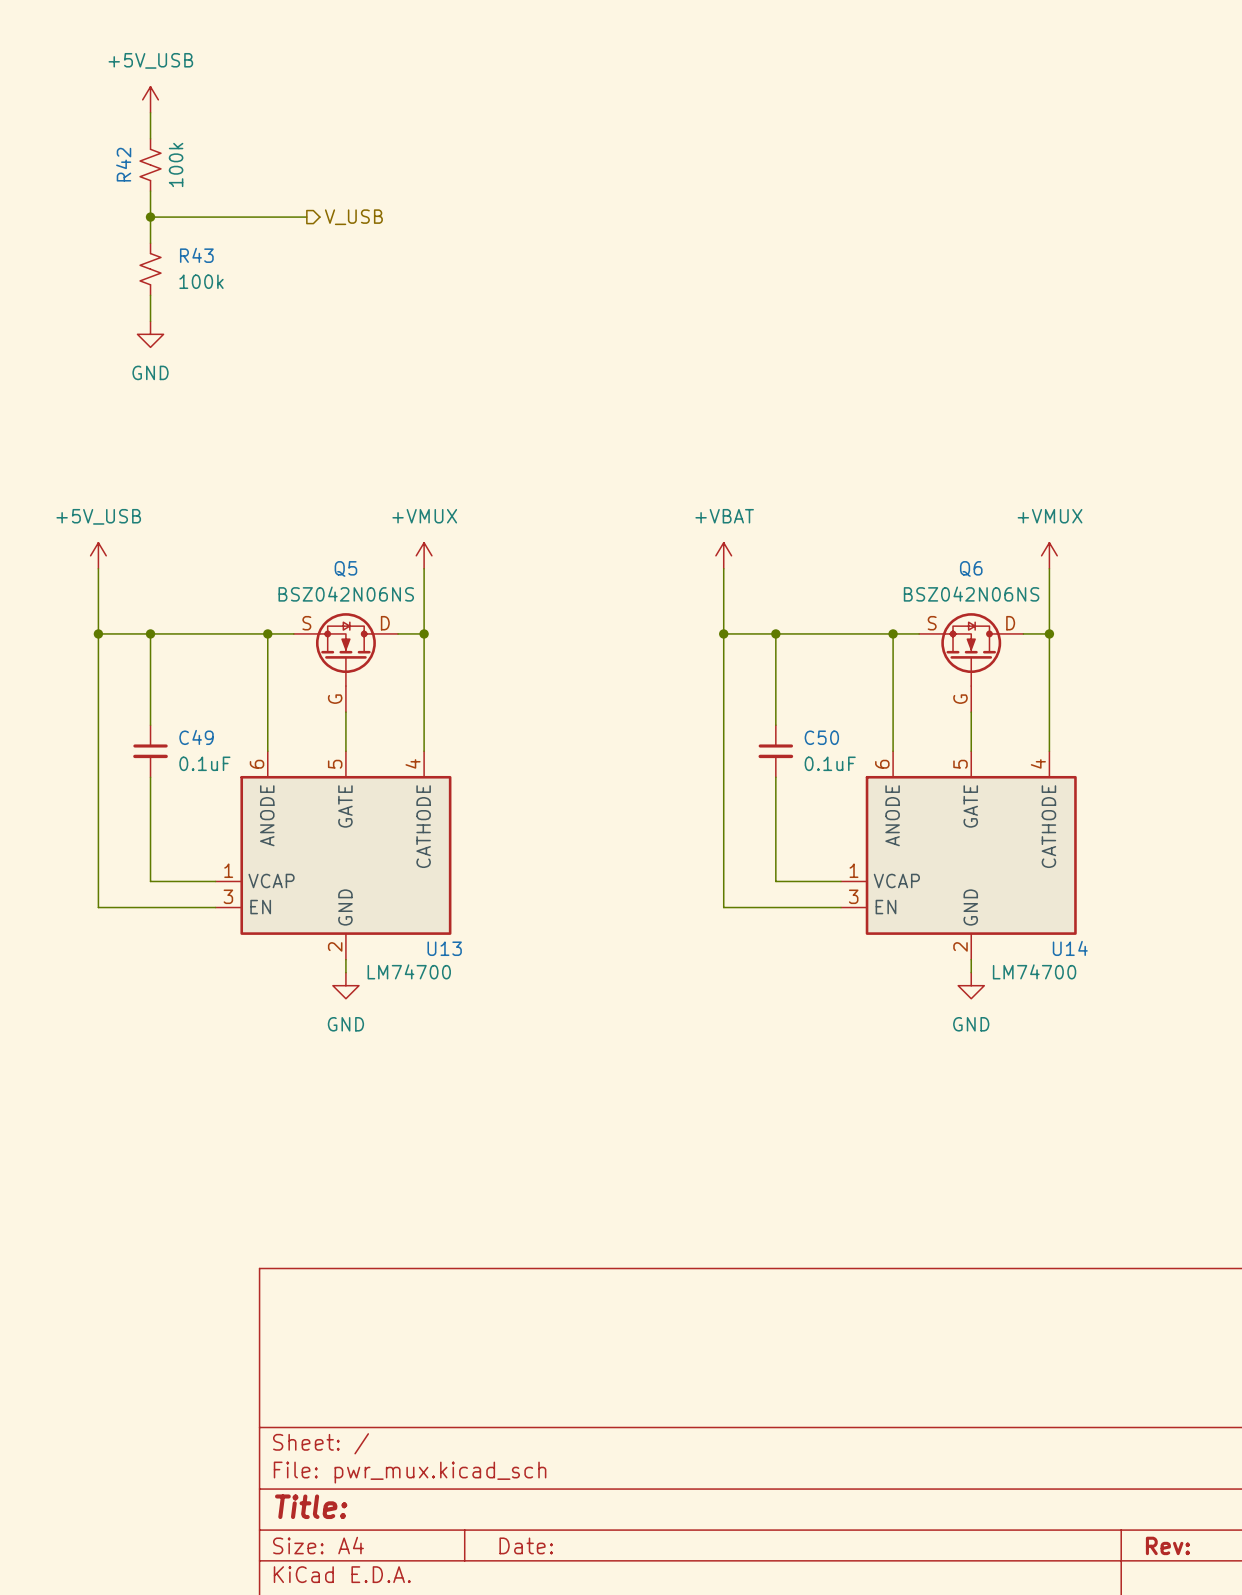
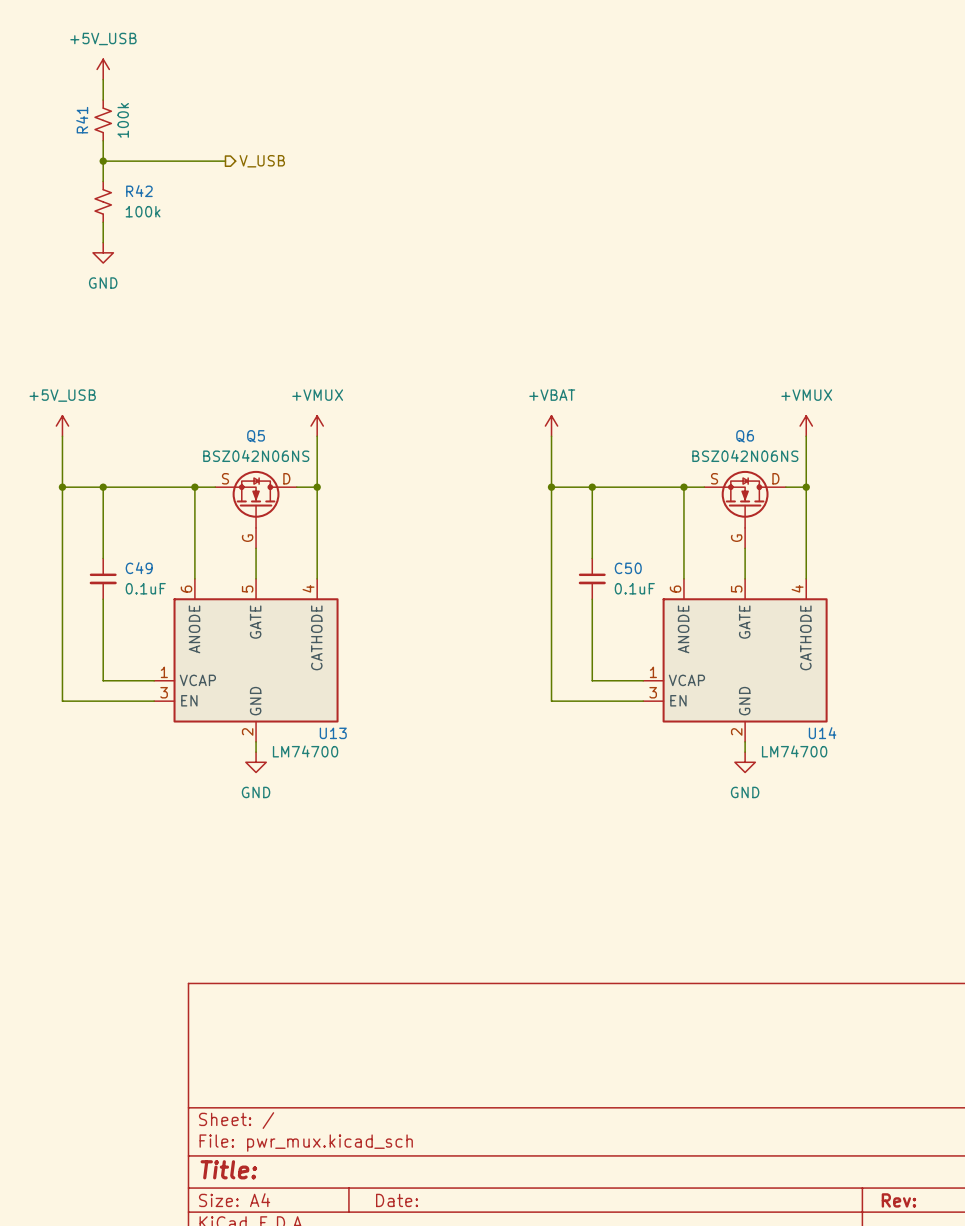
R42 name: R42 (123, 164) -> R41 (82, 120)
R43 name: R43 (196, 255) -> R42 (139, 191)

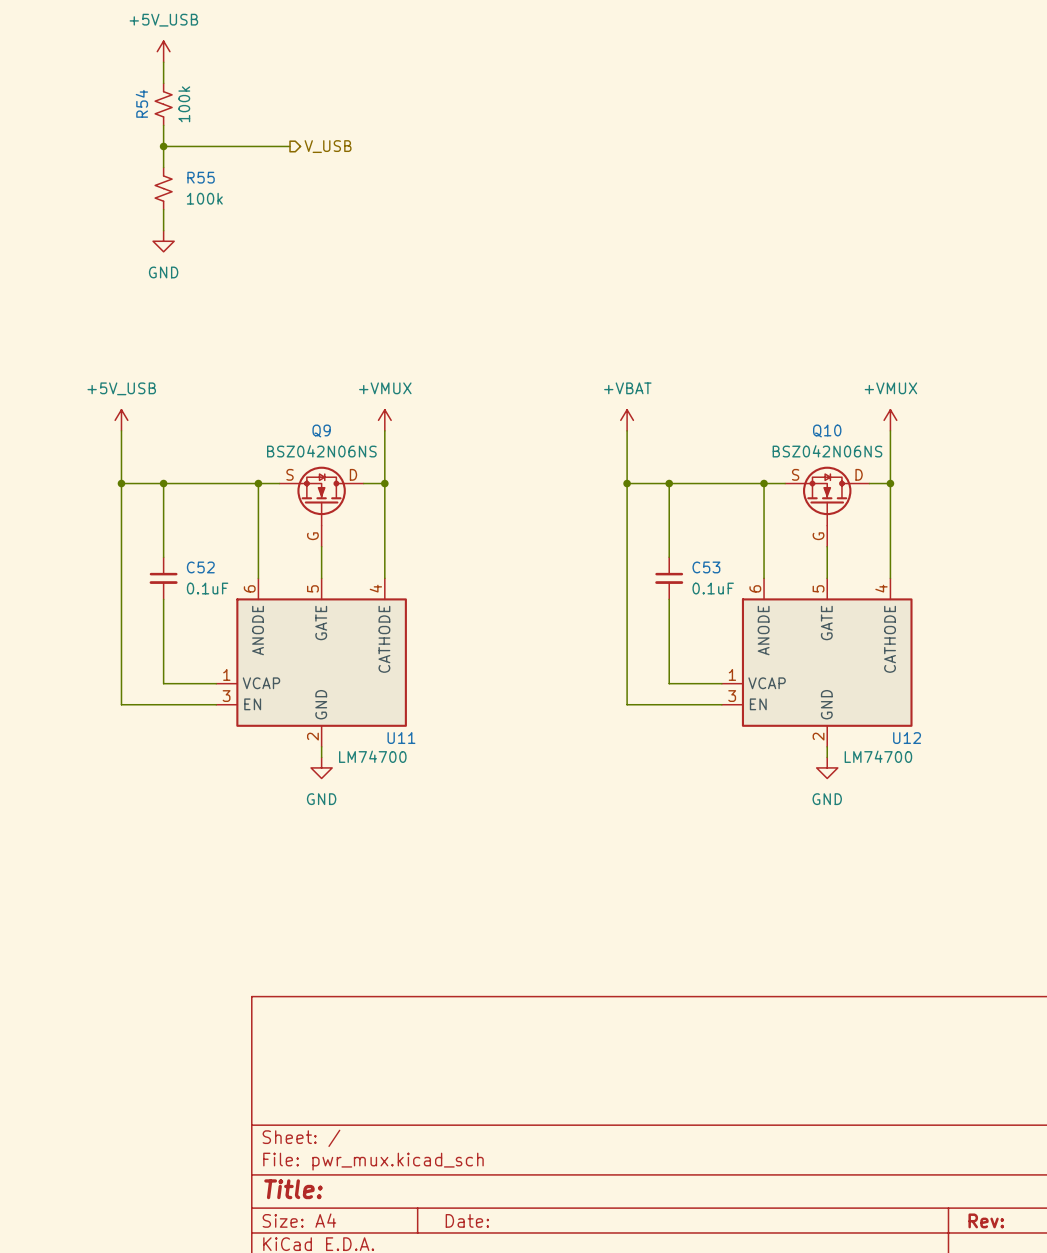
R41 name: R41 (82, 120) -> R54 (141, 103)
R42 name: R42 (139, 191) -> R55 (201, 177)
Q5 name: Q5 (256, 436) -> Q9 (321, 430)
Q6 name: Q6 (745, 436) -> Q10 (827, 430)
C49 name: C49 (139, 568) -> C52 (200, 567)
C50 name: C50 (628, 568) -> C53 (706, 567)
U13 name: U13 (333, 733) -> U11 (401, 738)
U14 name: U14 (822, 733) -> U12 (907, 738)

